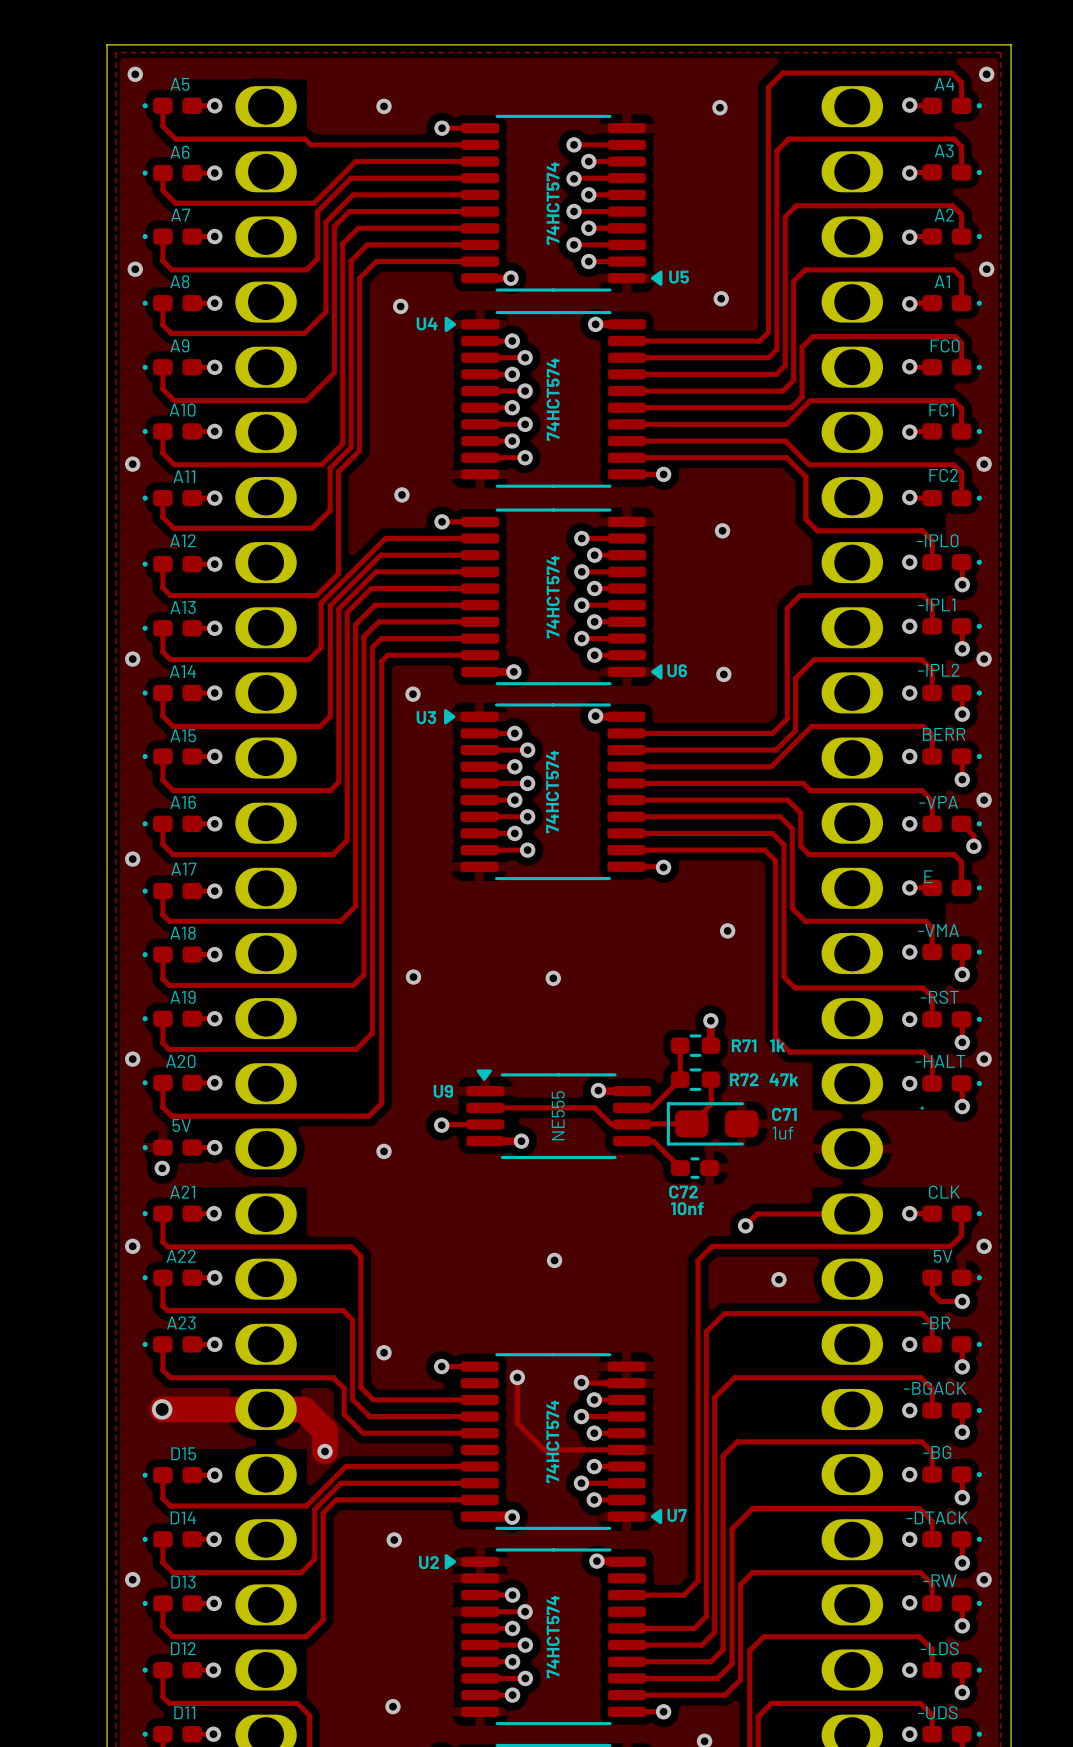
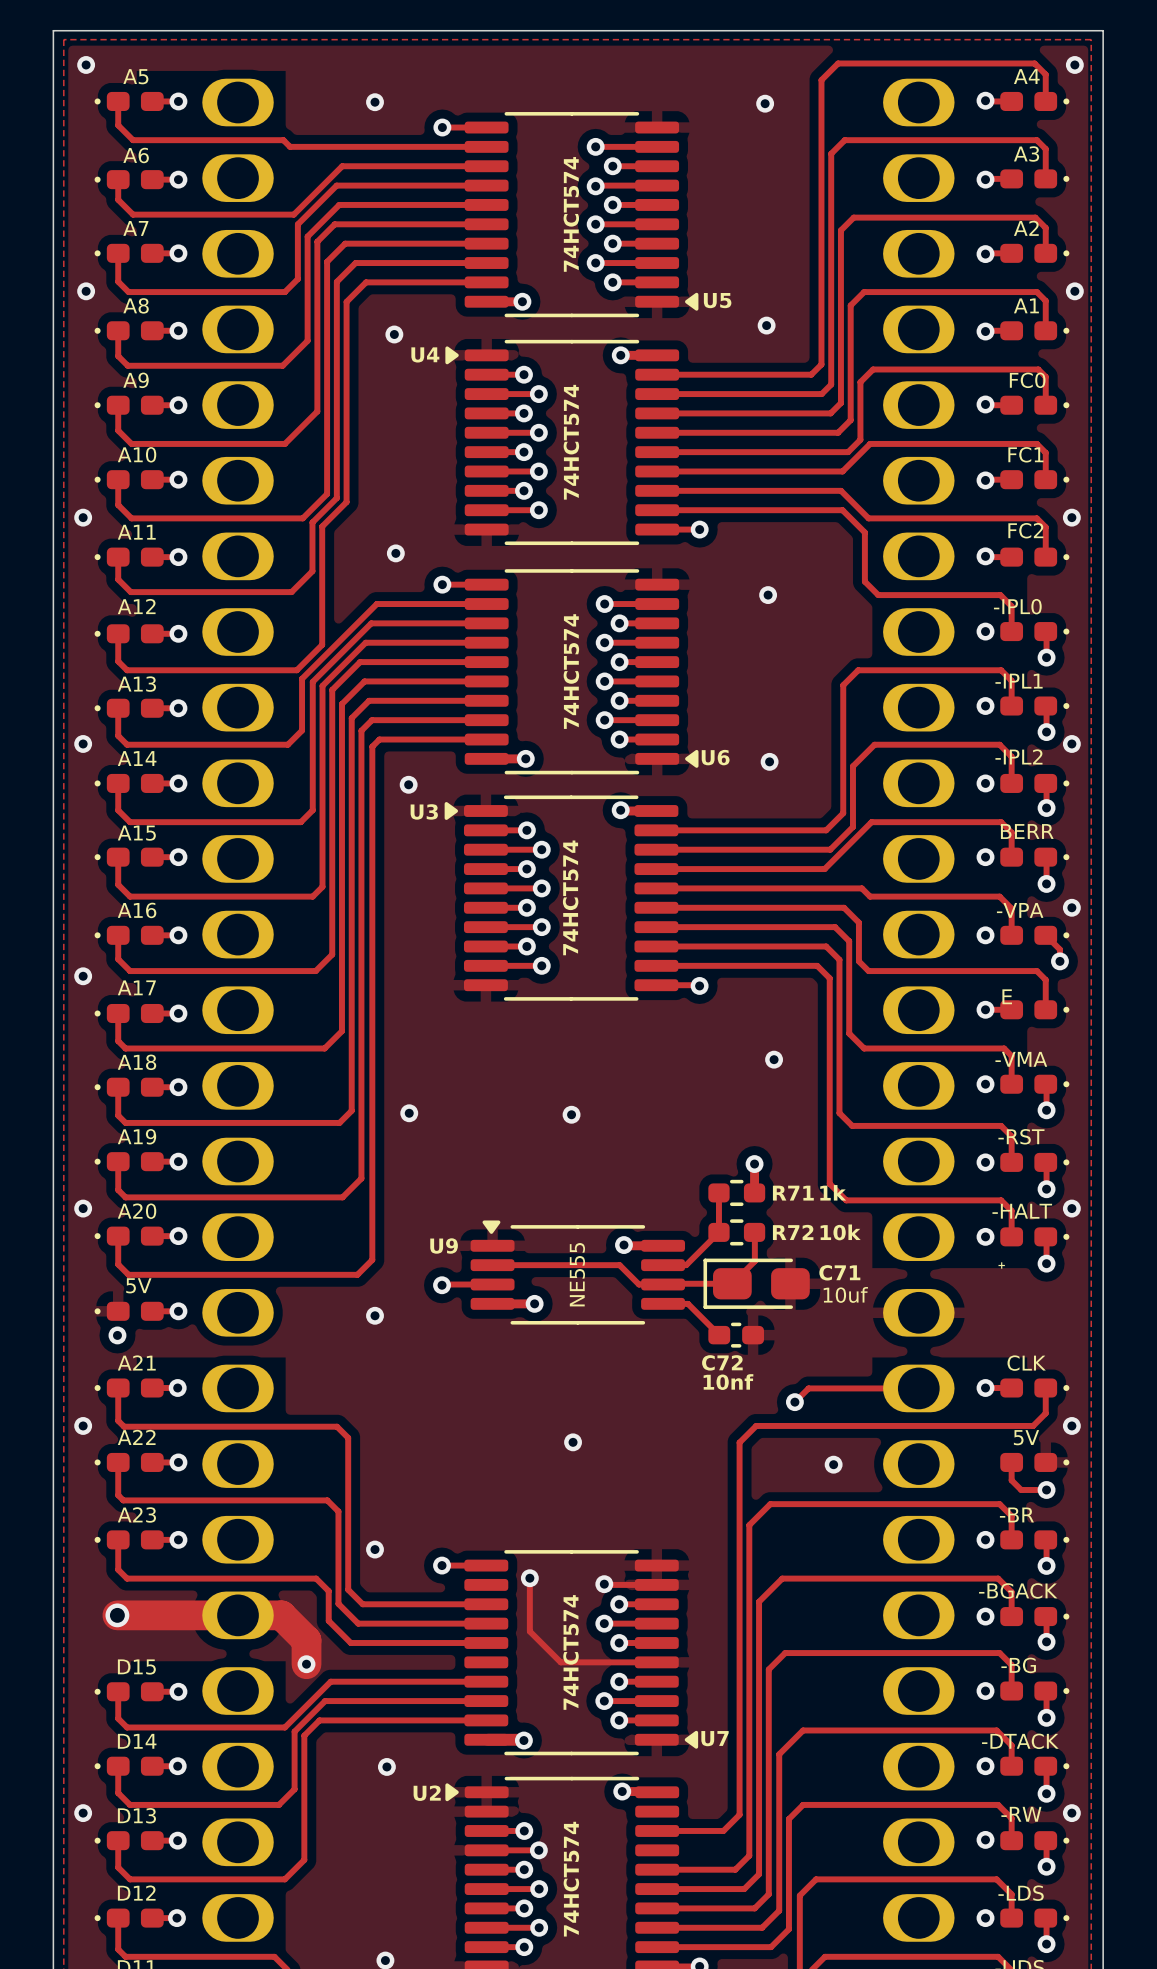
R72 value: 47k (783, 1079) -> 10k (840, 1232)
C71 value: 1uf (782, 1133) -> 10uf (845, 1294)

